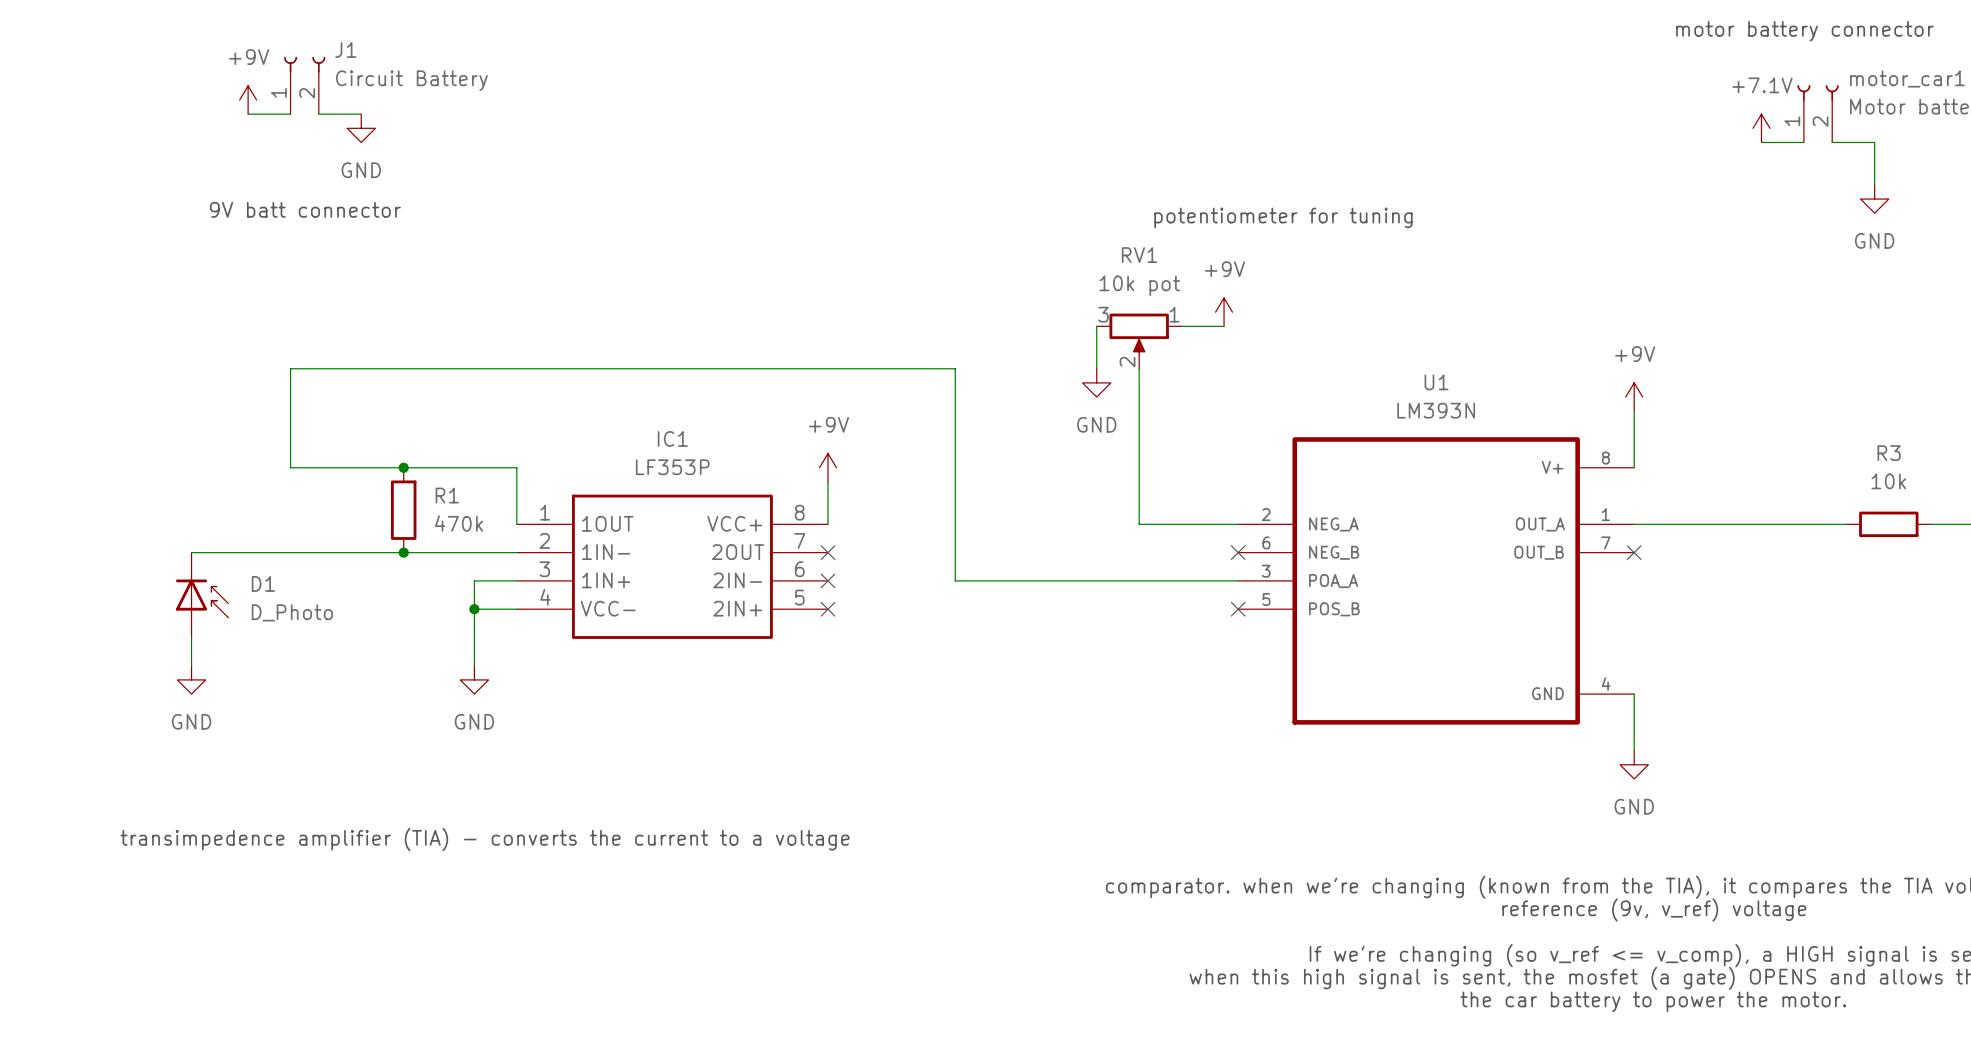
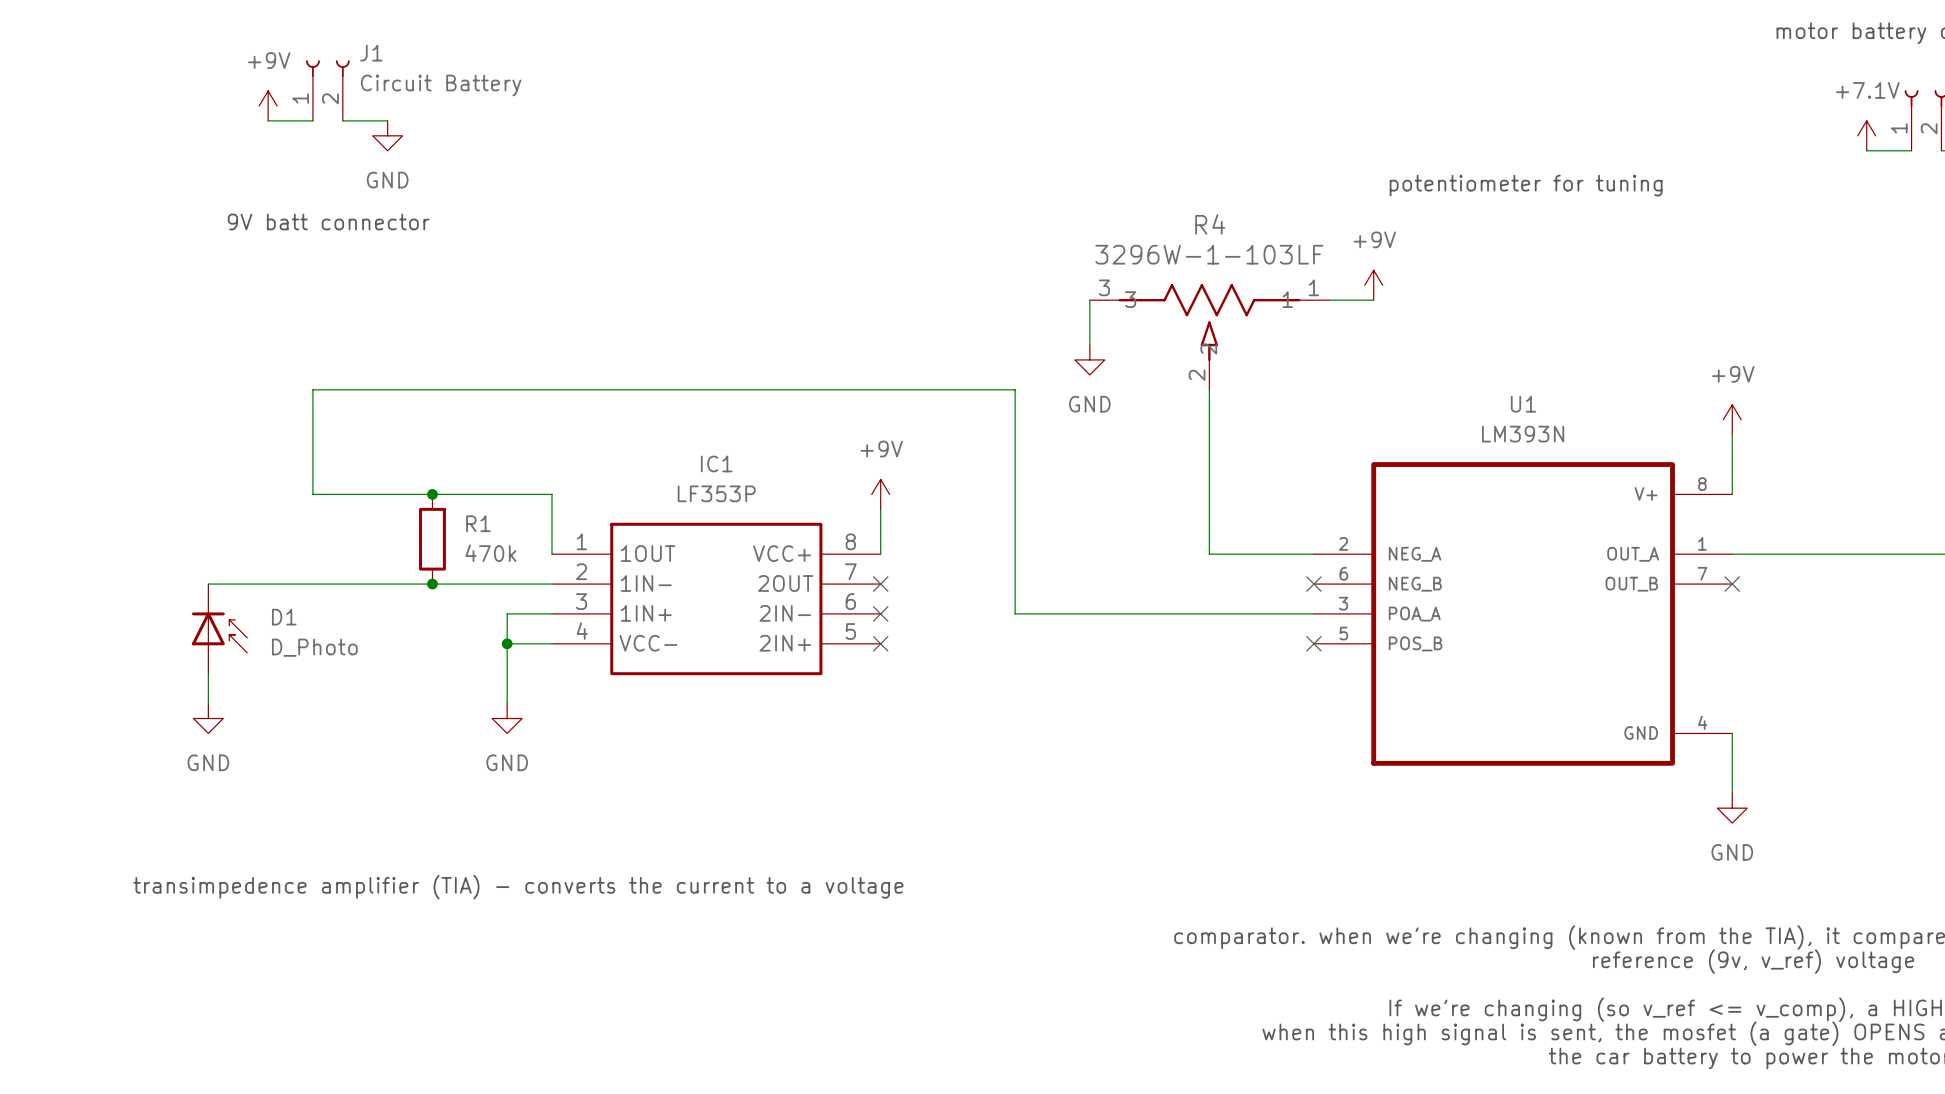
text position: potentiometer for tuning (1283, 217) -> potentiometer for tuning (1526, 185)
power symbol position: +9V (1224, 312) -> +9V (1373, 285)
R4: none -> 3296W-1-103LF (1209, 336)
wire: (1096, 326) (1096, 368) -> (1089, 300) (1089, 345)
wire: (1181, 326) (1224, 326) -> (1328, 300) (1373, 300)
RV1: 10k pot (1139, 341) -> none
power symbol position: GND (1096, 382) -> GND (1089, 359)

